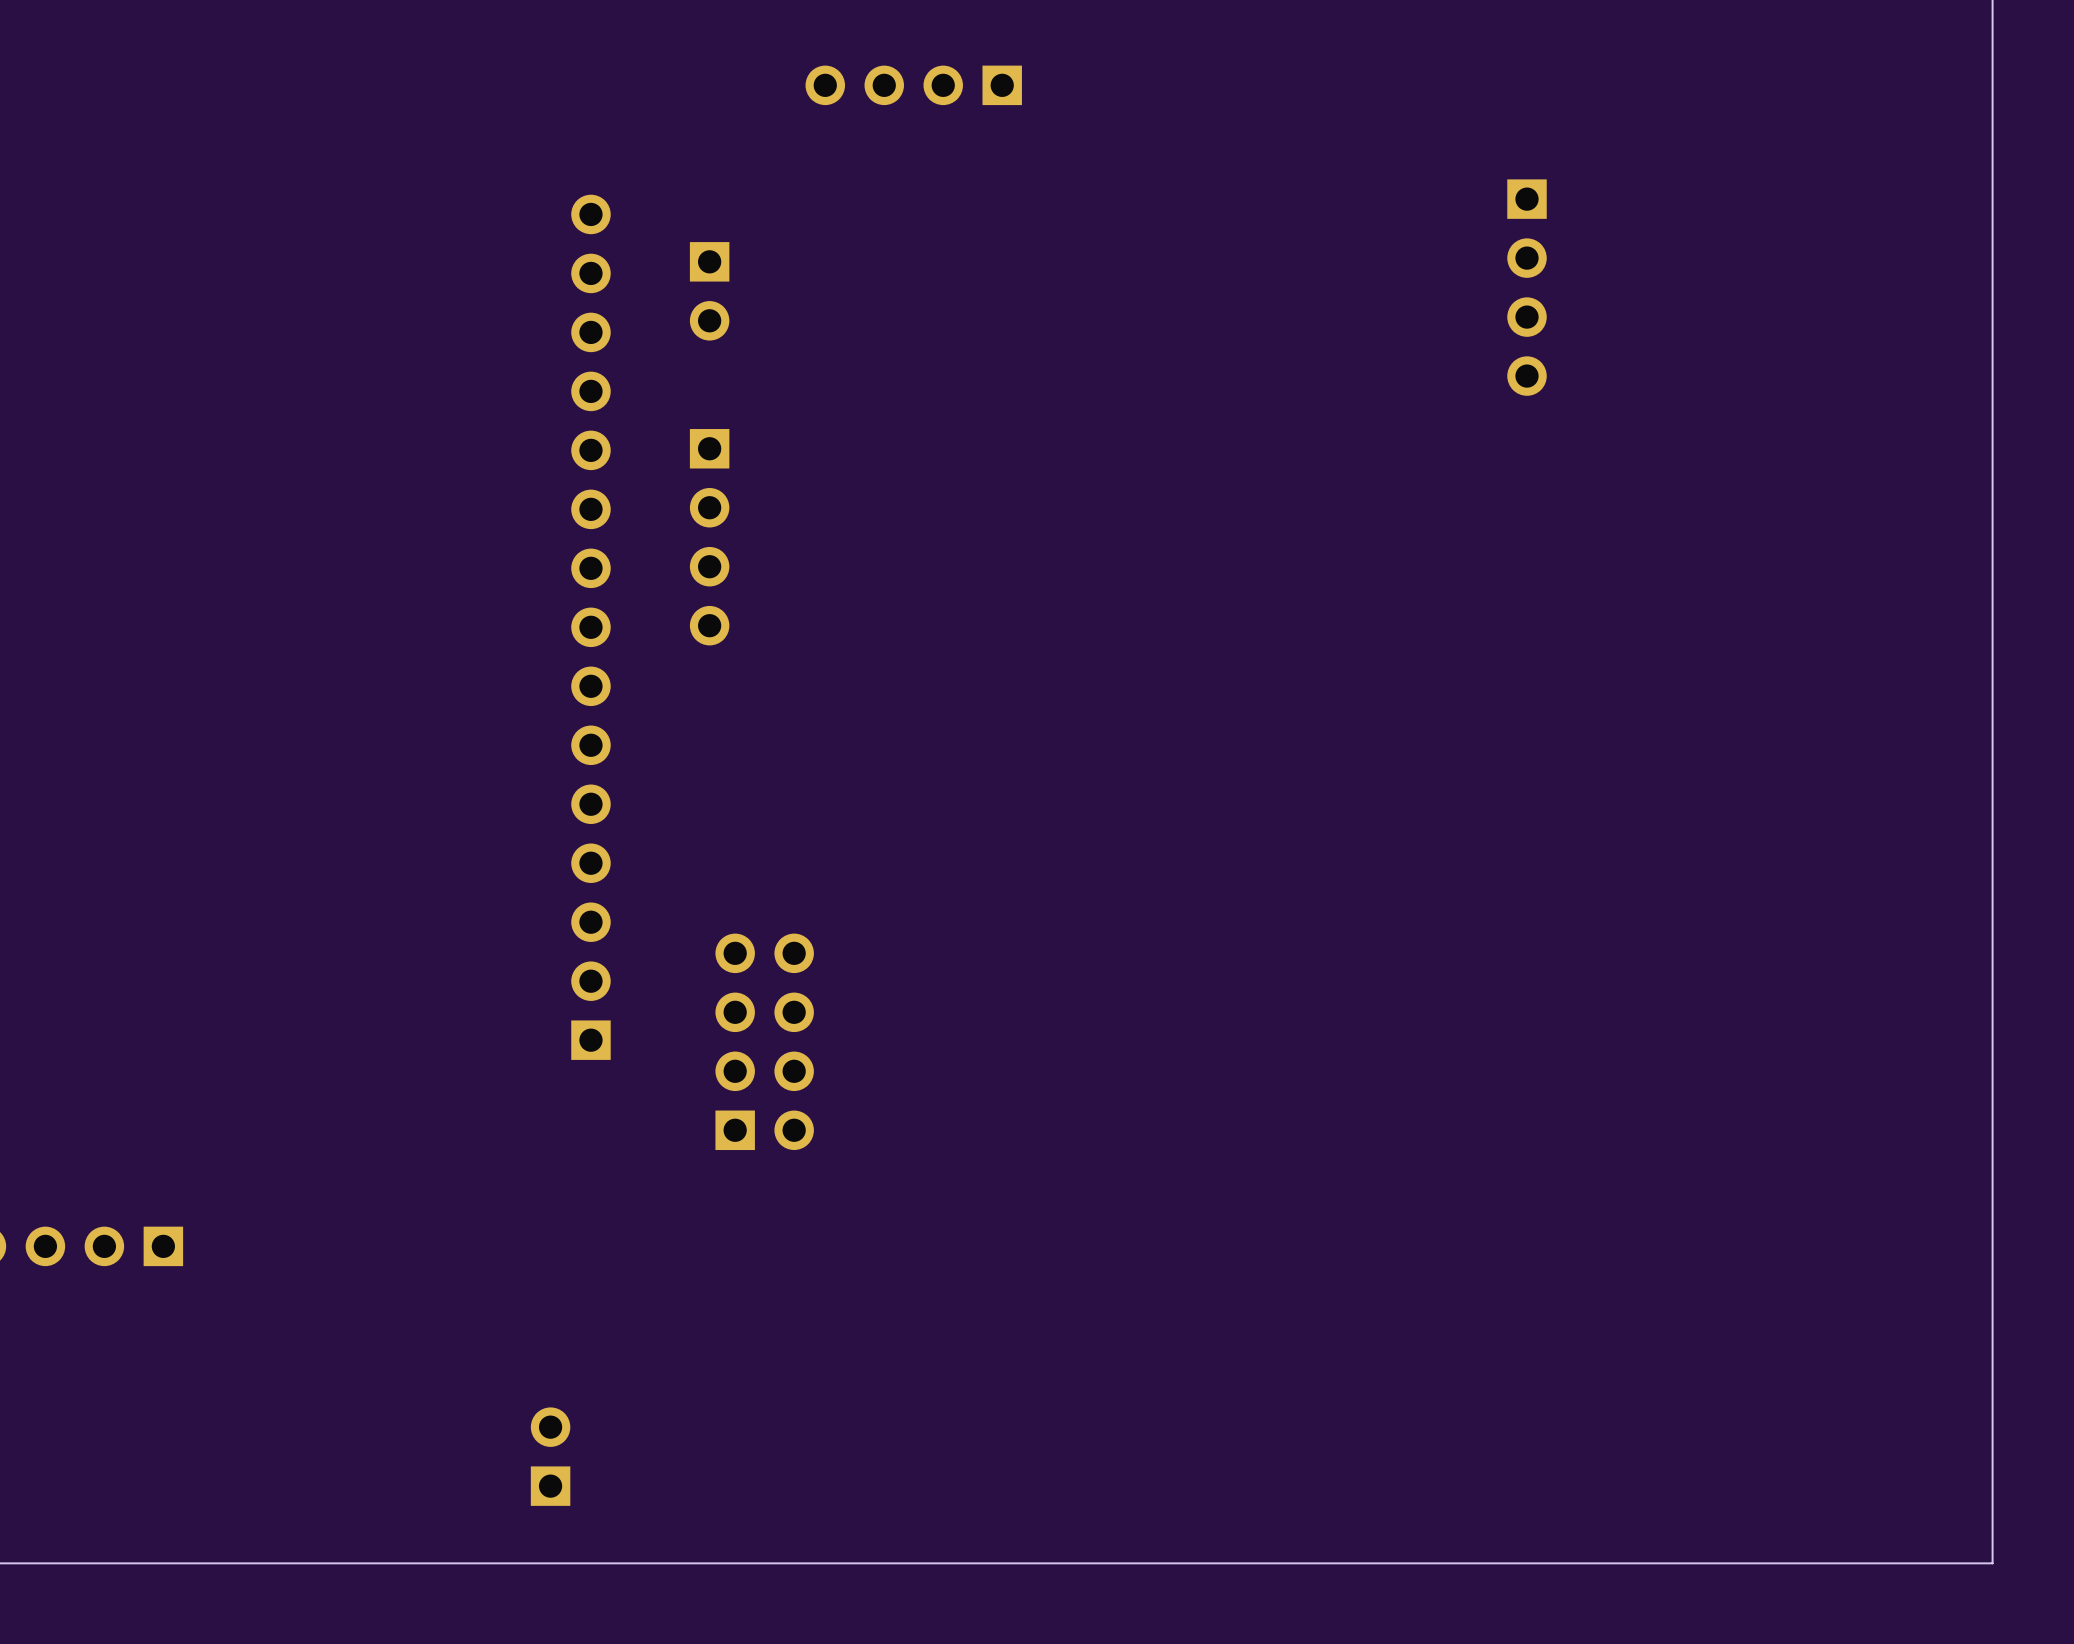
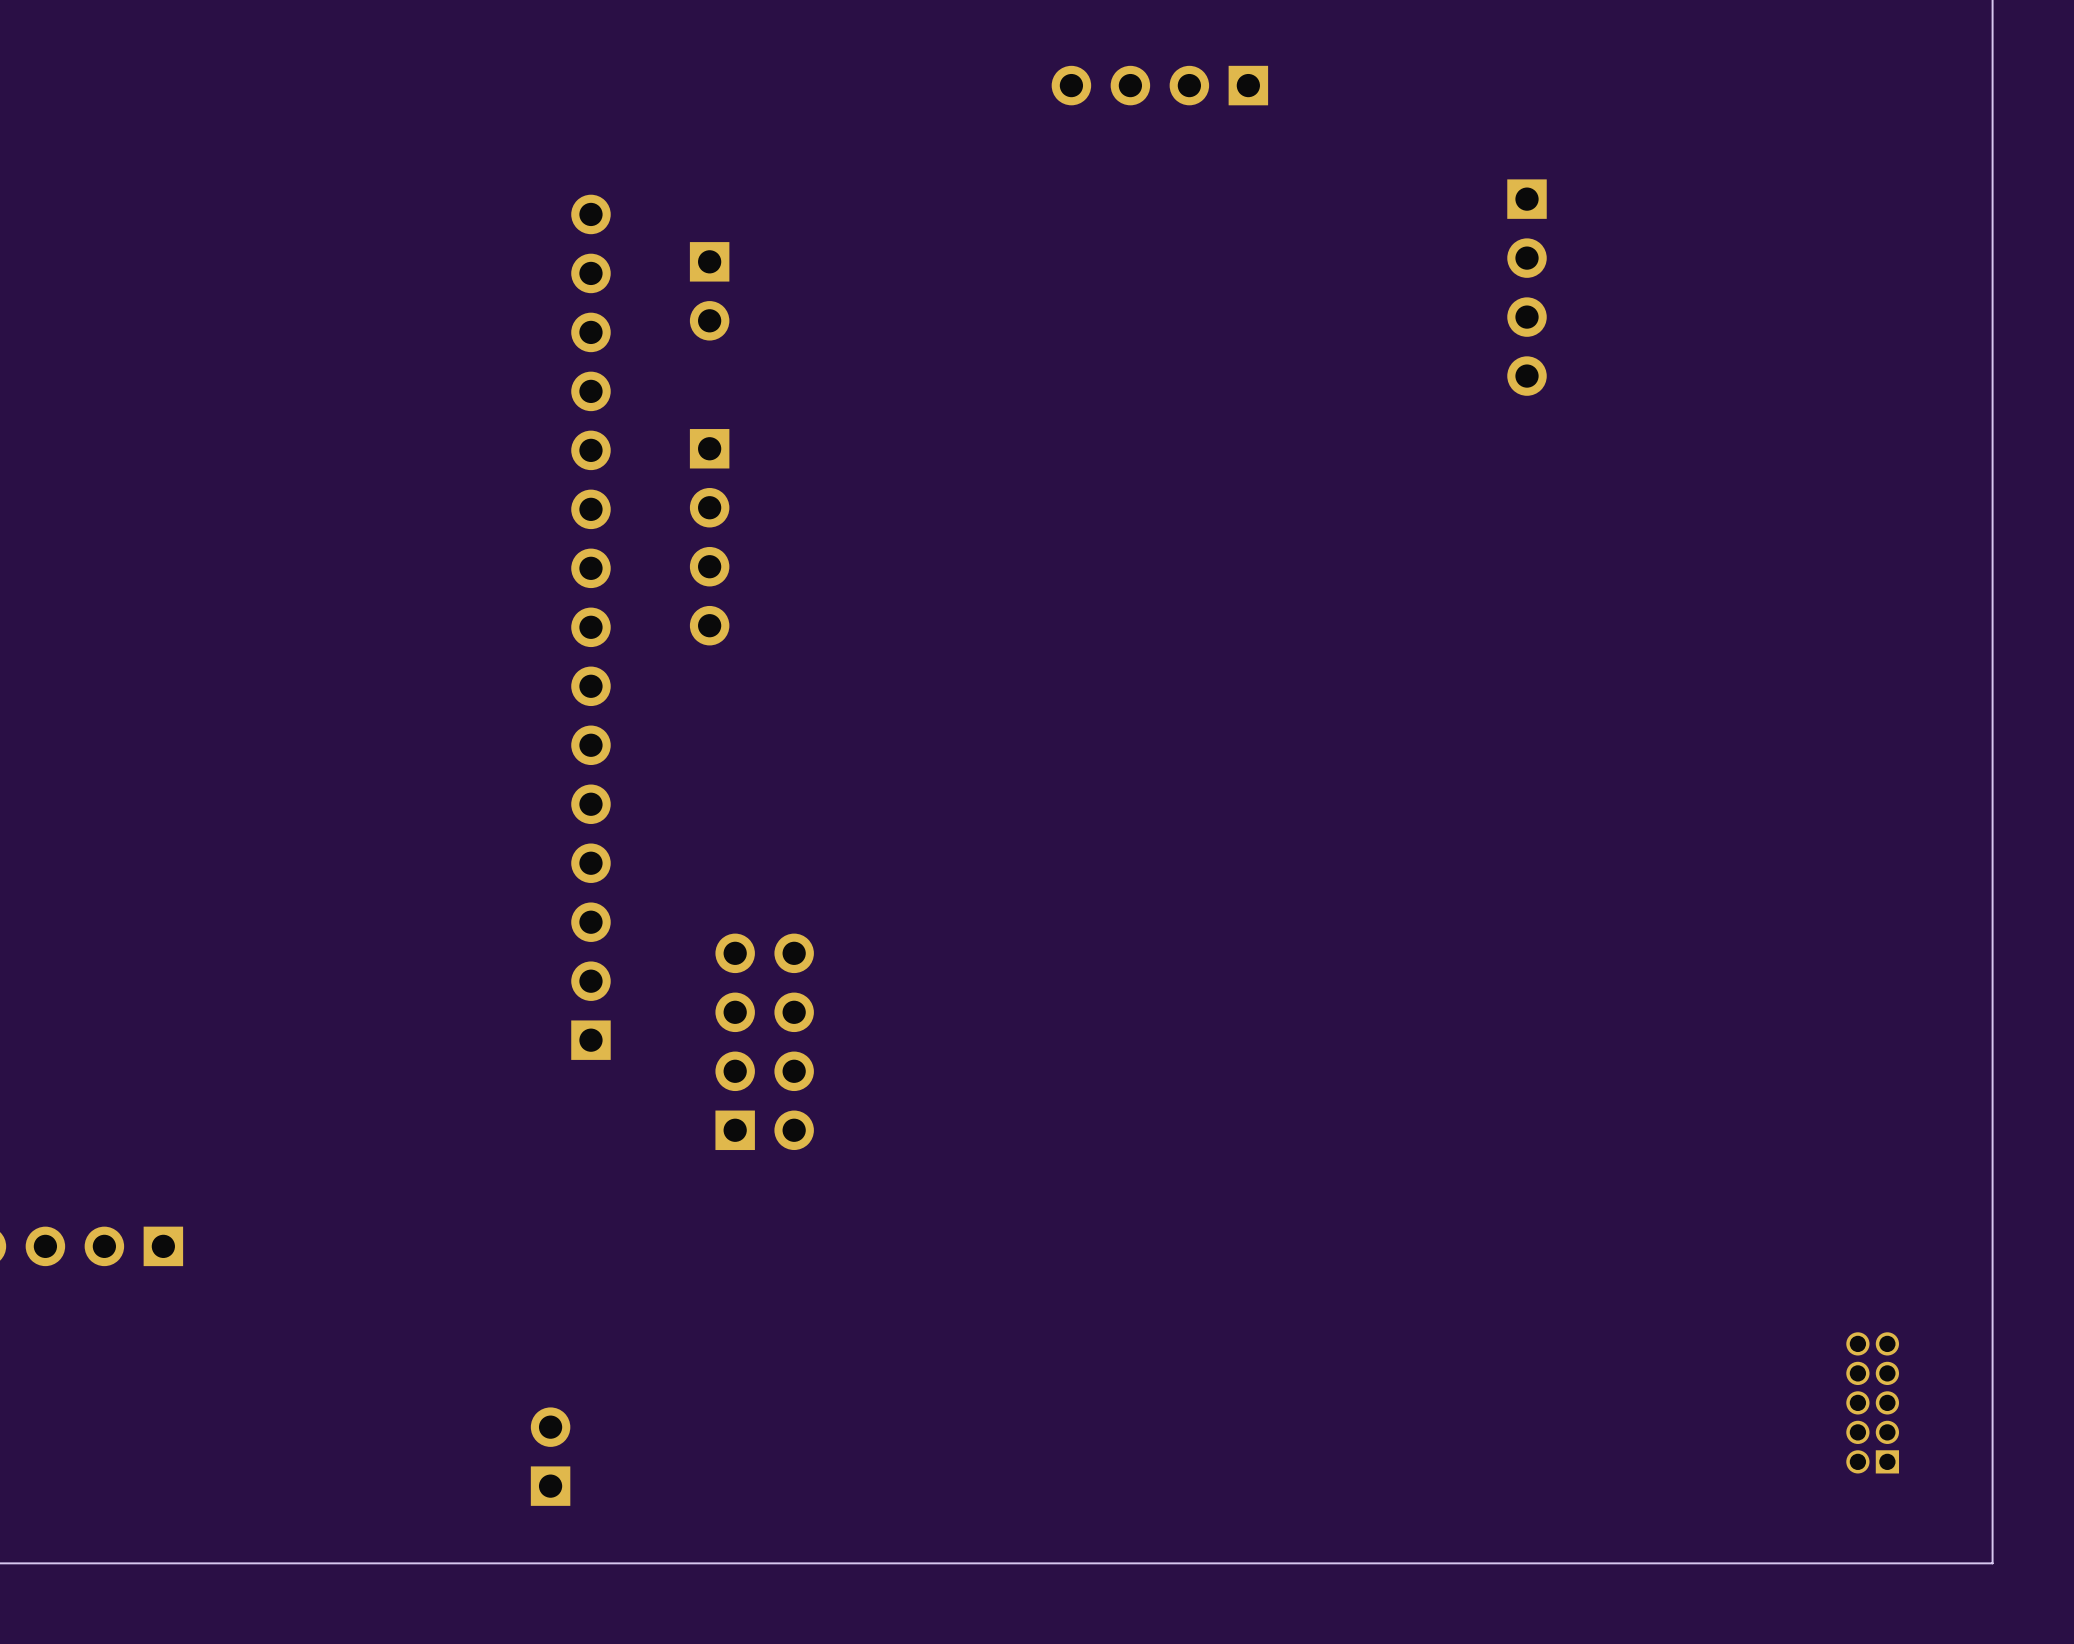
part position: (913, 85) -> (1159, 85)
part: none -> (1872, 1402)

